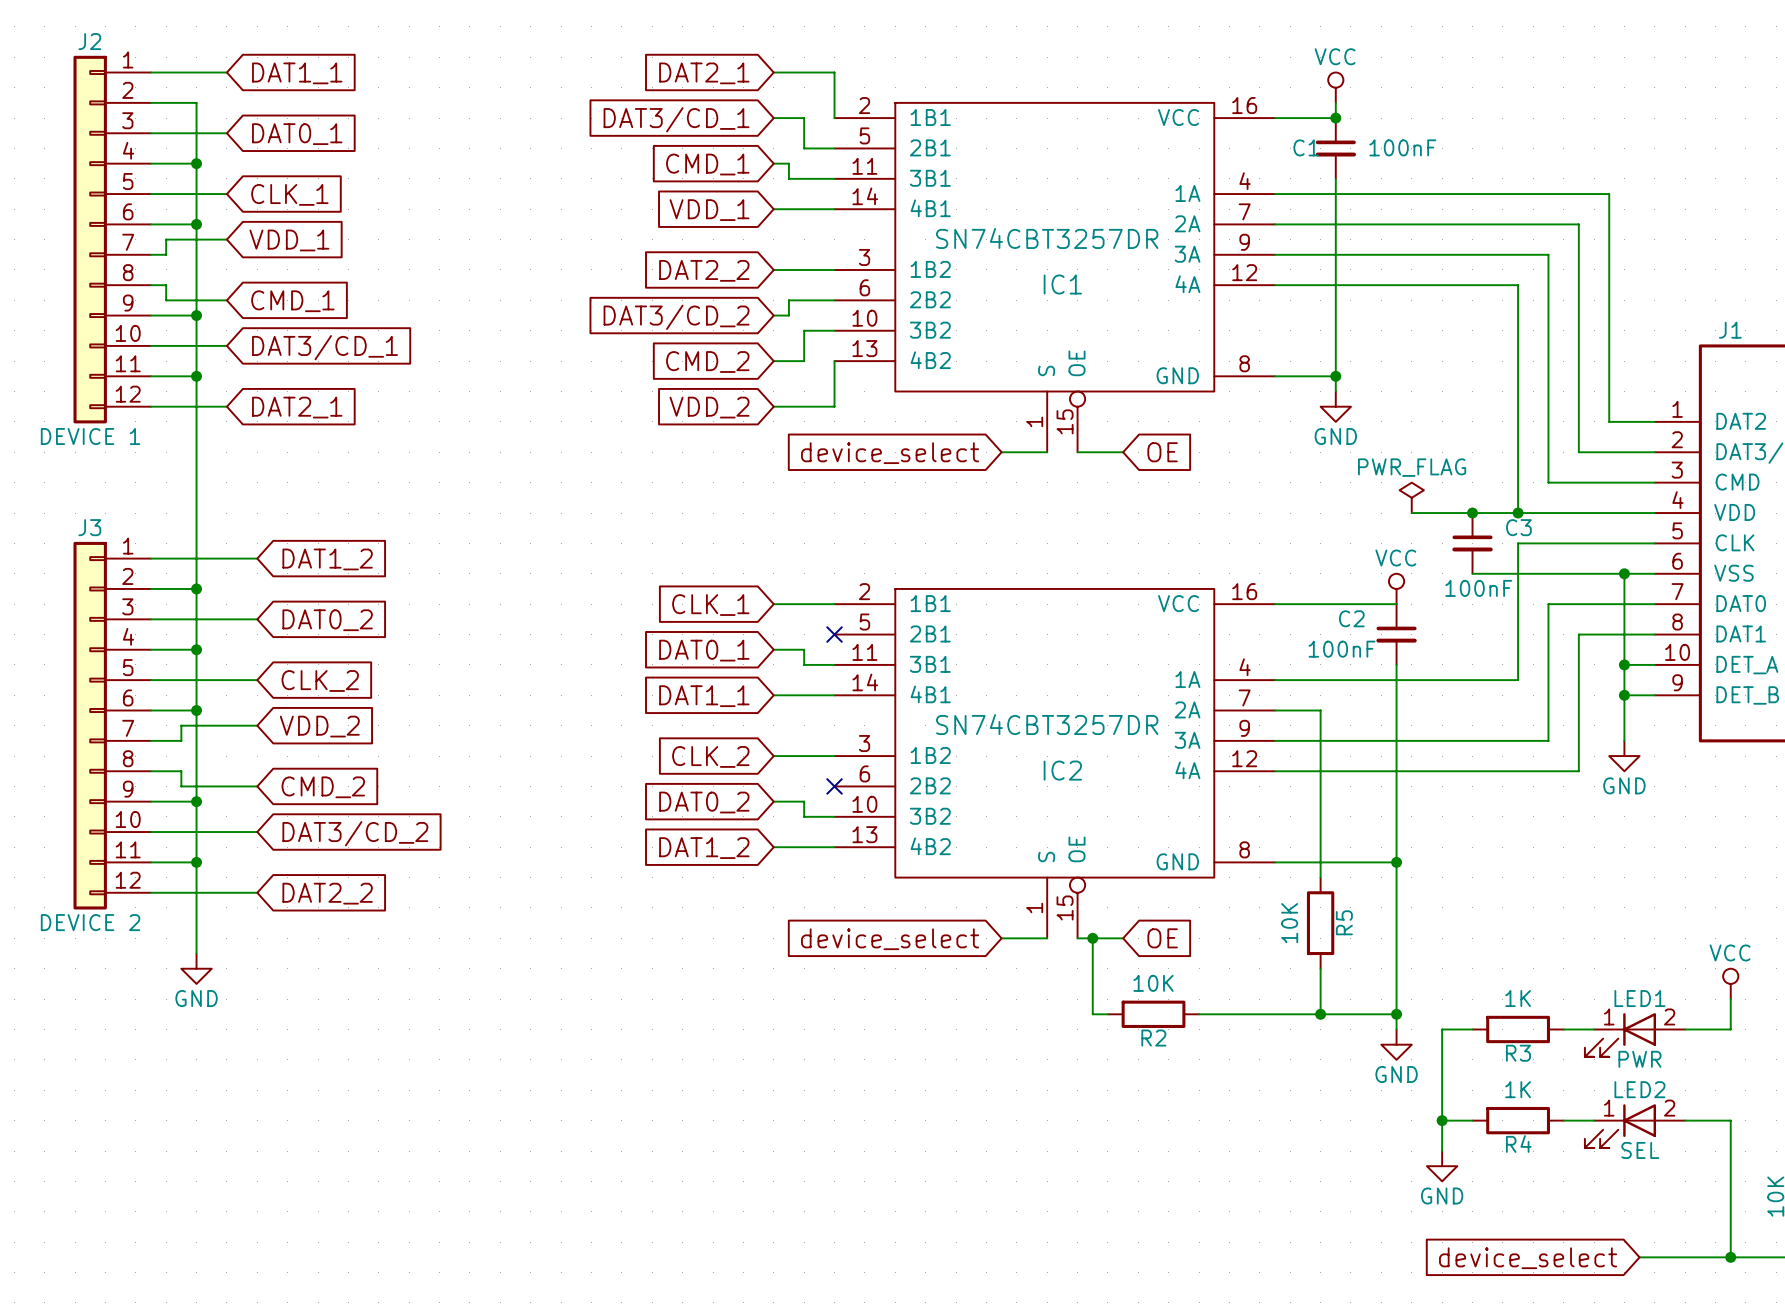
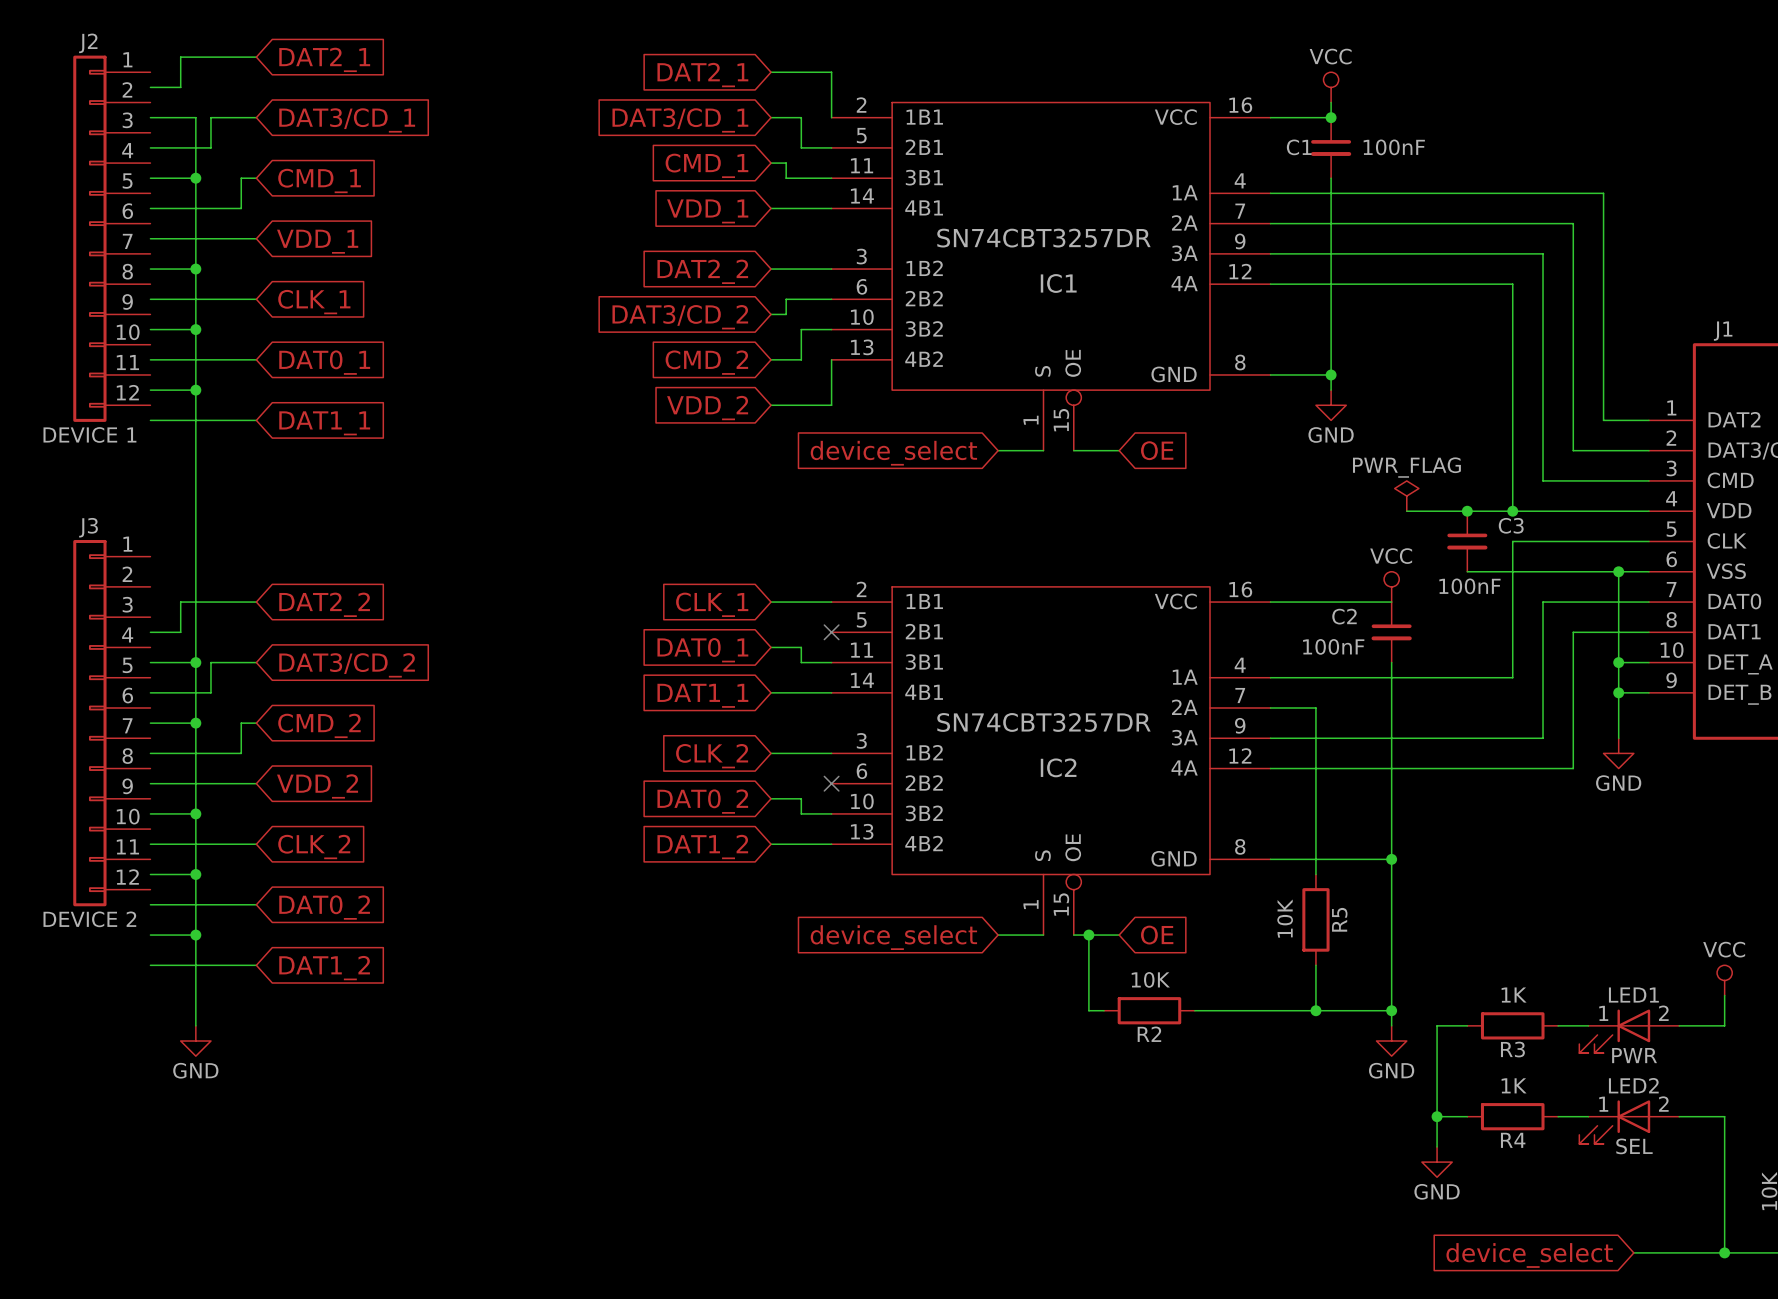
wire: none -> (256, 57) (180, 57) (180, 87) (150, 87)
wire: (150, 72) (226, 72) -> none
global label: DAT1_1 (297, 73) -> DAT2_1 (324, 59)
wire: (150, 102) (196, 102) (196, 118) -> (150, 117) (195, 117)
wire: none -> (256, 117) (210, 117) (210, 147) (150, 147)
wire: (150, 133) (226, 133) -> none
global label position: DAT0_1 (297, 134) -> DAT0_1 (324, 362)
wire: (150, 163) (196, 163) -> (150, 178) (195, 178)
junction position: (196, 163) -> (195, 178)
wire: none -> (256, 178) (241, 178) (241, 208) (150, 208)
wire: (150, 194) (226, 194) -> none
global label position: CLK_1 (289, 194) -> CLK_1 (314, 302)
wire: (150, 224) (196, 224) -> (150, 269) (195, 269)
junction: (196, 224) -> none
wire: (166, 239) (166, 254) (150, 254) -> (165, 238) (150, 238)
wire: none -> (226, 238) (256, 238)
global label position: VDD_1 (289, 240) -> VDD_1 (317, 241)
junction: none -> (195, 269)
wire: (150, 285) (166, 285) (166, 300) -> (150, 299) (165, 299)
wire: none -> (226, 299) (256, 299)
global label position: CMD_1 (292, 301) -> CMD_1 (319, 180)
wire: (150, 315) (196, 315) -> (150, 329) (195, 329)
junction position: (196, 315) -> (195, 329)
wire: (150, 345) (226, 345) -> none
global label position: DAT3/CD_1 (325, 347) -> DAT3/CD_1 (347, 120)
wire: (150, 376) (196, 376) -> (150, 390) (195, 390)
junction position: (196, 376) -> (195, 390)
wire: (150, 406) (226, 406) -> none
global label: DAT2_1 (297, 407) -> DAT1_1 (324, 423)
wire: (150, 558) (257, 558) -> (150, 359) (256, 359)
global label: DAT1_2 (327, 559) -> none
wire: (150, 588) (196, 588) -> none
junction: (196, 588) -> none
wire: none -> (256, 602) (180, 602) (180, 632) (150, 632)
wire: (150, 619) (257, 619) -> (150, 420) (256, 420)
global label position: DAT0_2 (327, 620) -> DAT0_2 (324, 907)
wire: (150, 649) (196, 649) -> (150, 662) (195, 662)
junction position: (196, 649) -> (195, 662)
wire: none -> (256, 662) (210, 662) (210, 692) (150, 692)
wire: (150, 680) (257, 680) -> (150, 965) (256, 965)
global label position: CLK_2 (320, 680) -> CLK_2 (314, 847)
wire: (150, 710) (196, 710) -> (150, 935) (195, 935)
junction position: (196, 710) -> (195, 723)
wire: (181, 725) (181, 740) (150, 740) -> (180, 723) (150, 723)
wire: (196, 725) (242, 725) -> (150, 753) (241, 753) (241, 723)
global label: VDD_2 (319, 726) -> CMD_2 (319, 725)
wire: (150, 771) (181, 771) (181, 786) -> (150, 783) (180, 783)
global label: CMD_2 (323, 787) -> VDD_2 (317, 786)
wire: (150, 801) (196, 801) -> (150, 813) (195, 813)
junction position: (196, 801) -> (195, 813)
wire: (150, 832) (257, 832) -> (150, 844) (256, 844)
global label position: DAT3/CD_2 (355, 833) -> DAT3/CD_2 (347, 665)
wire: (150, 862) (196, 862) -> (150, 874) (195, 874)
junction position: (196, 862) -> (195, 874)
wire: (150, 892) (257, 892) -> (150, 904) (256, 904)
global label position: DAT2_2 (327, 893) -> DAT2_2 (324, 604)
junction: none -> (195, 935)
wire: none -> (195, 950) (195, 1025)
power symbol position: GND (196, 968) -> GND (195, 1041)
global label: none -> DAT1_2 (324, 968)

